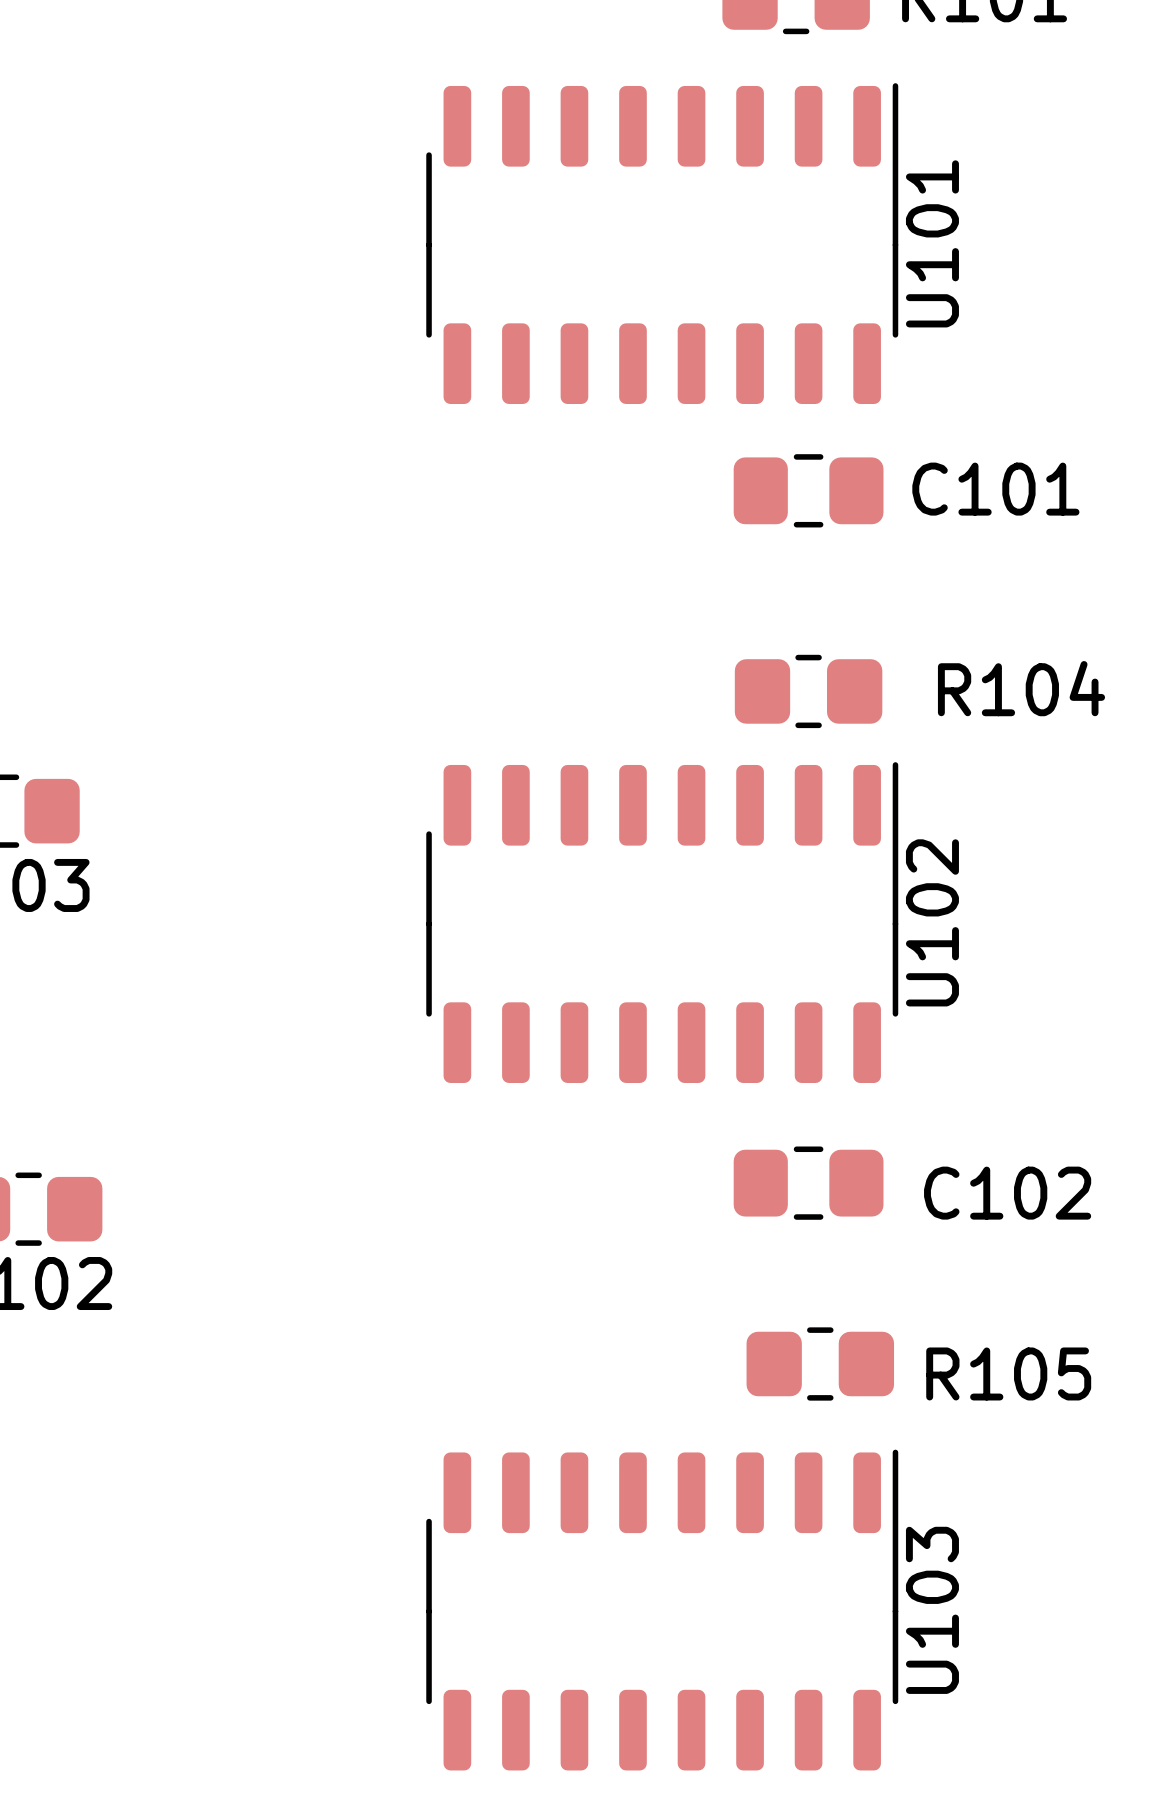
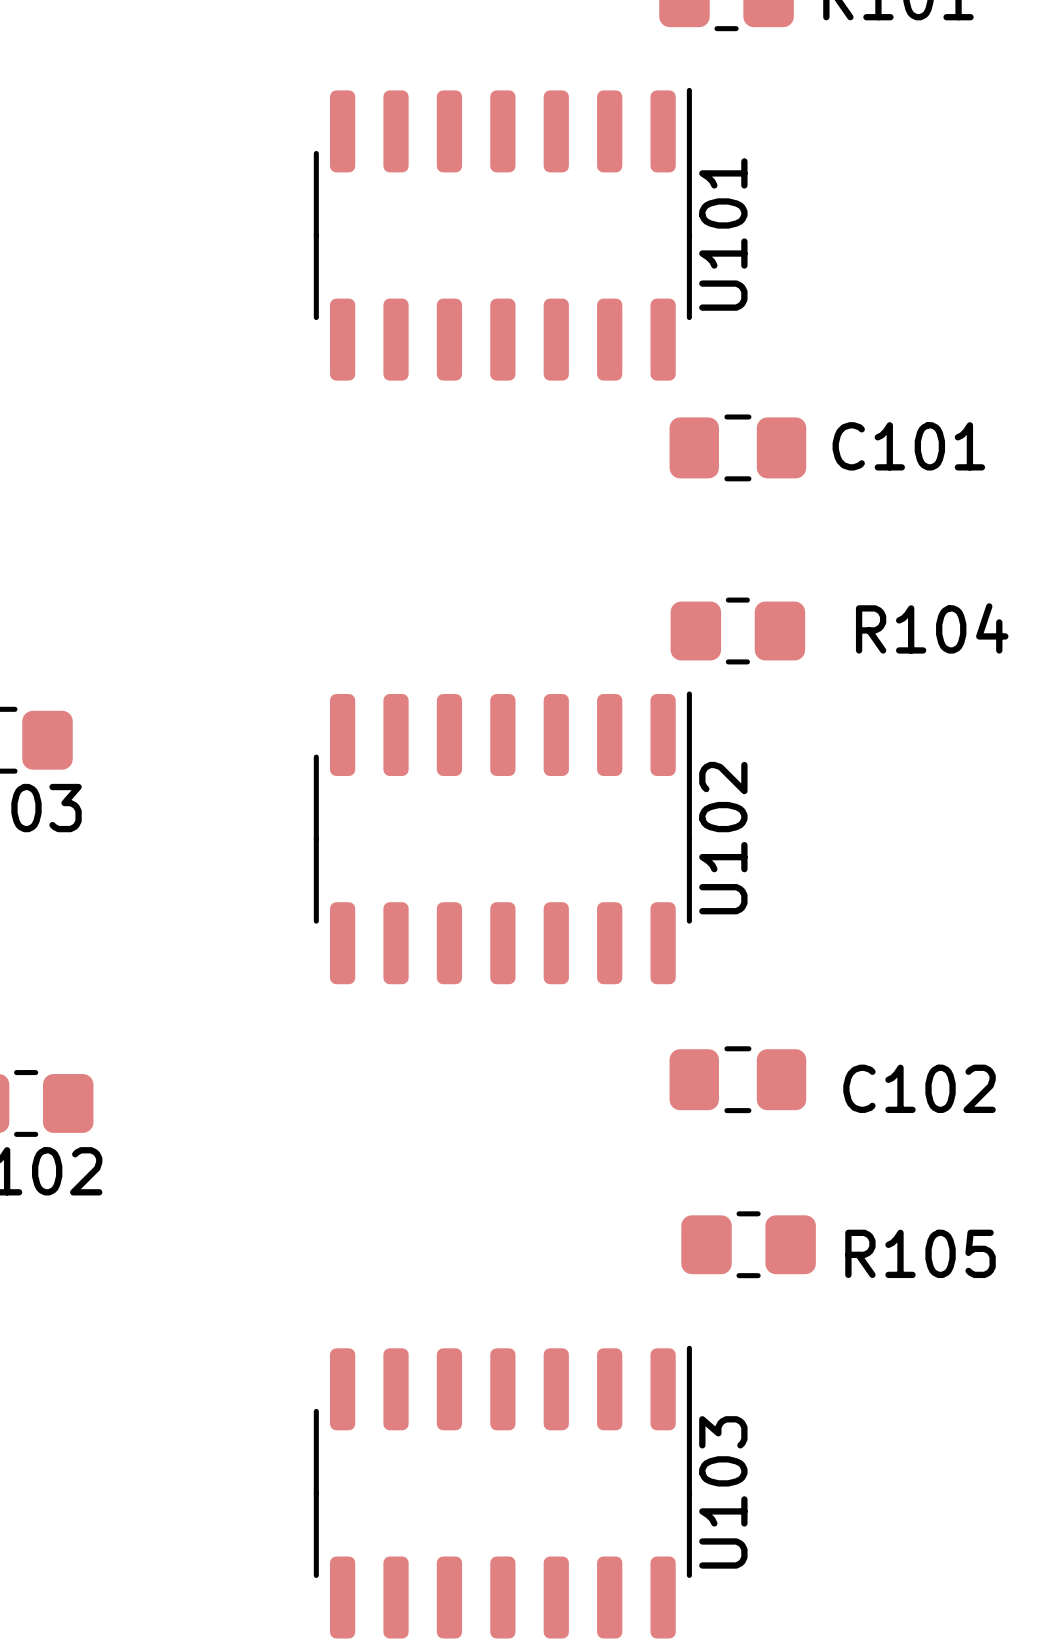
U101 footprint: [426, 83, 899, 404] -> [313, 87, 692, 381]
U102 footprint: [426, 762, 899, 1083] -> [313, 691, 692, 985]
U103 footprint: [426, 1449, 899, 1771] -> [313, 1345, 692, 1639]

